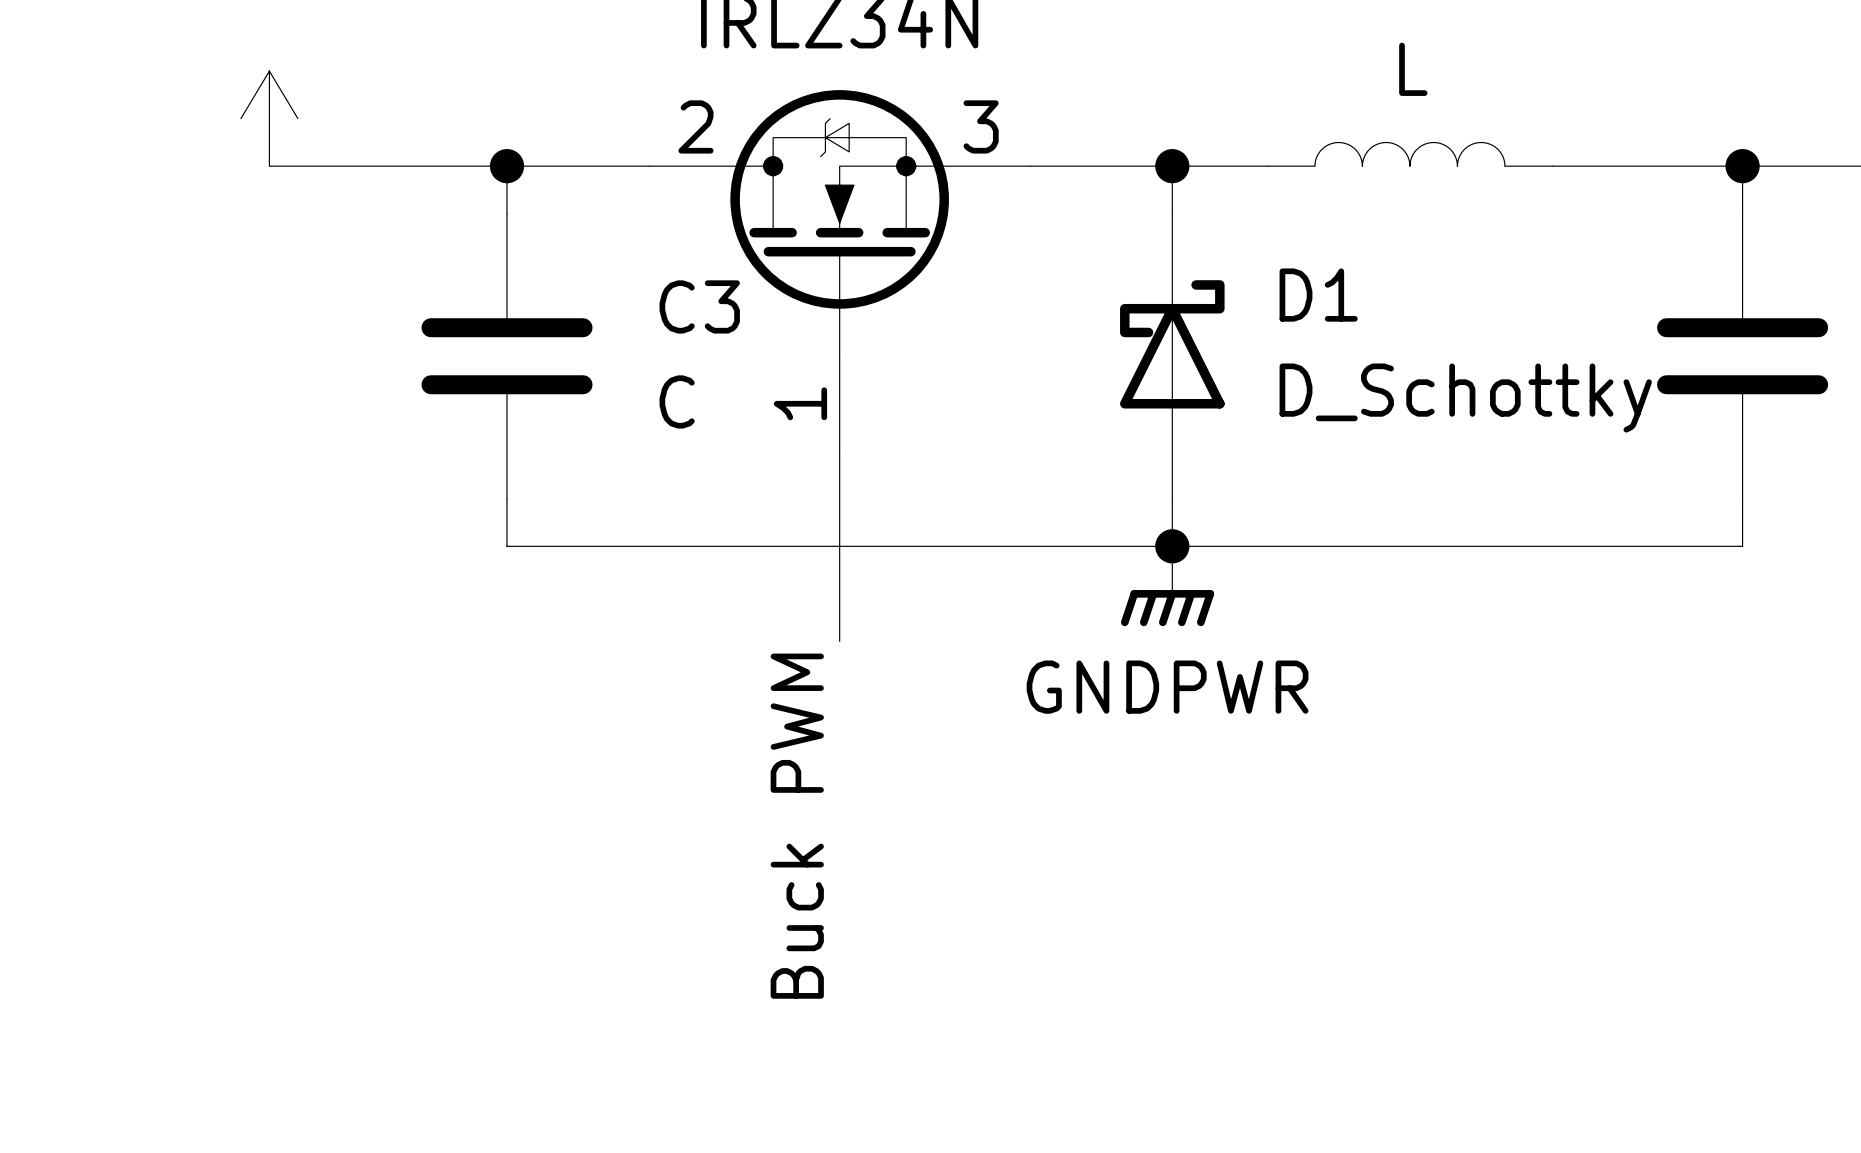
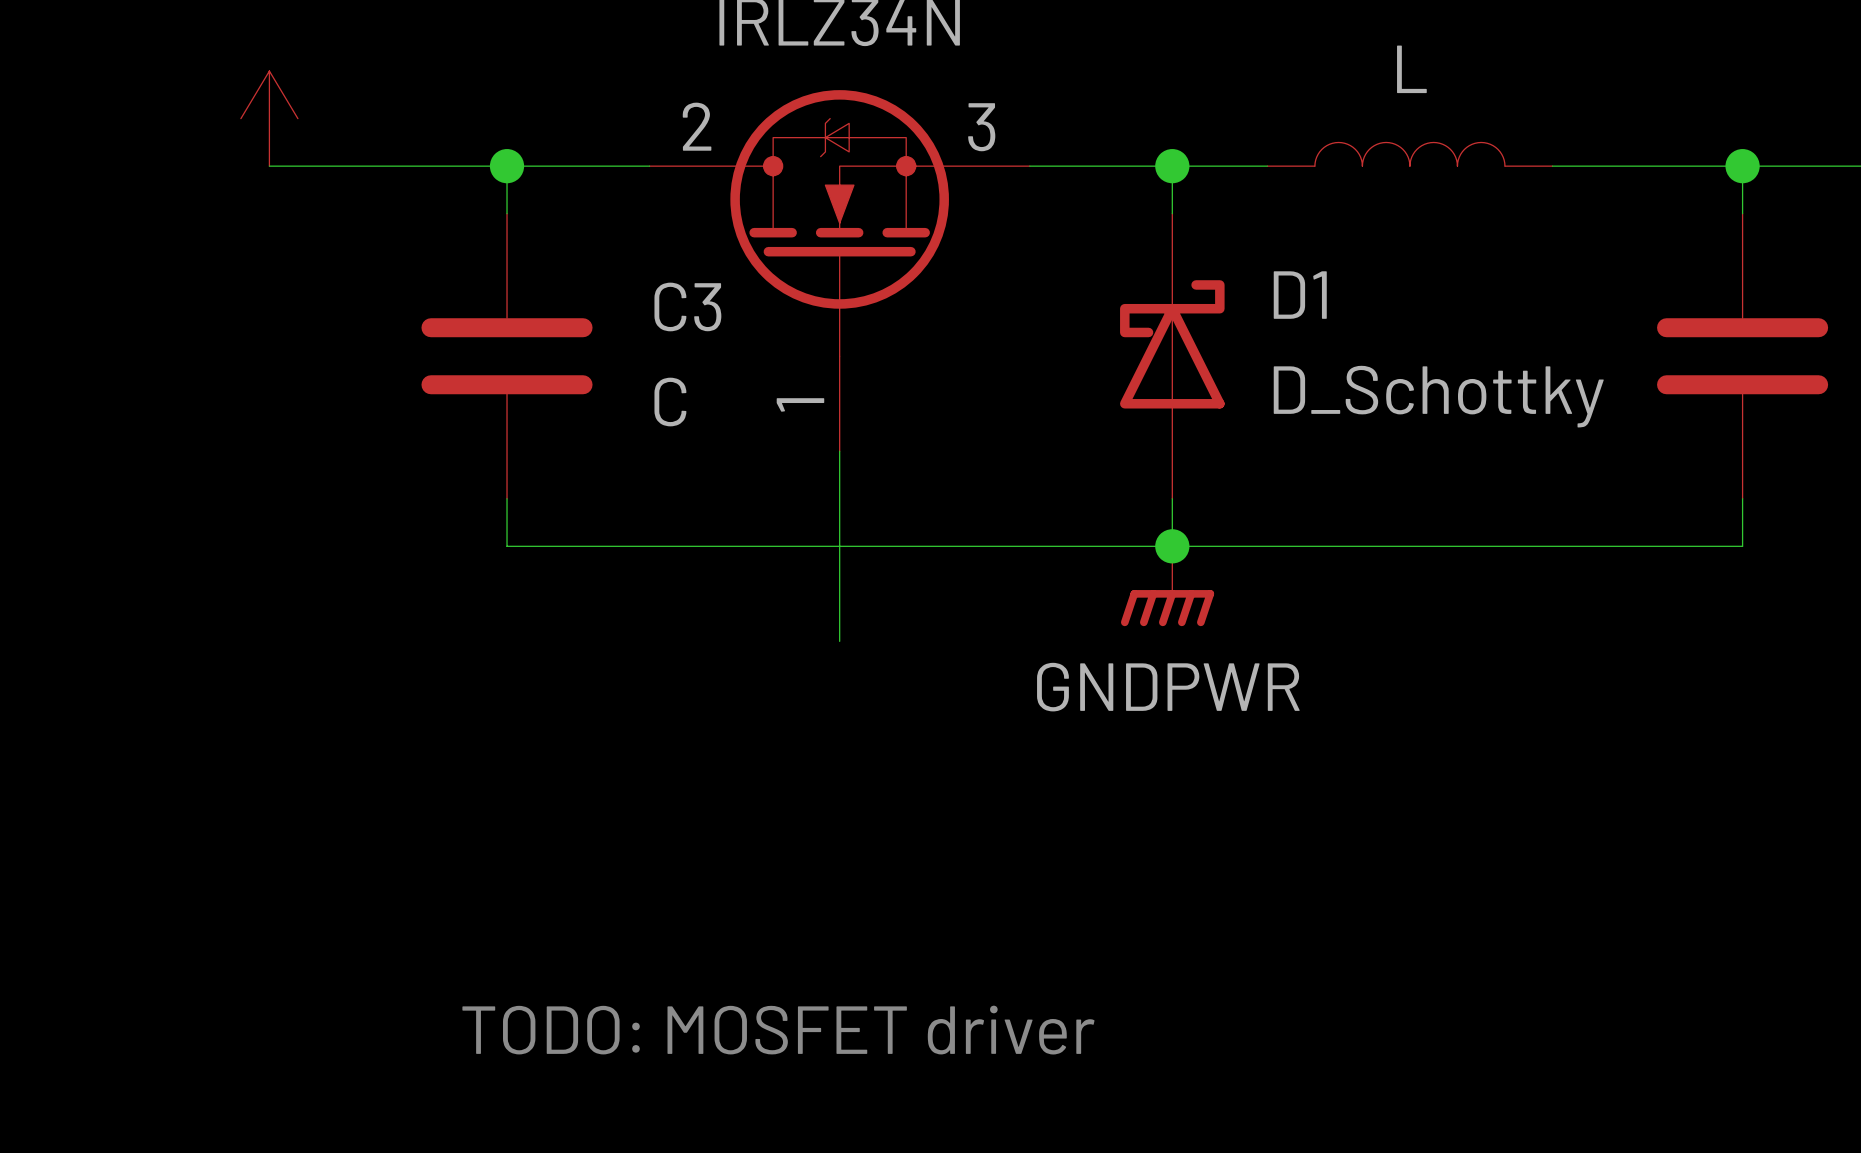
label: Buck PWM (797, 826) -> none
text: none -> TODO: MOSFET driver (778, 1030)

